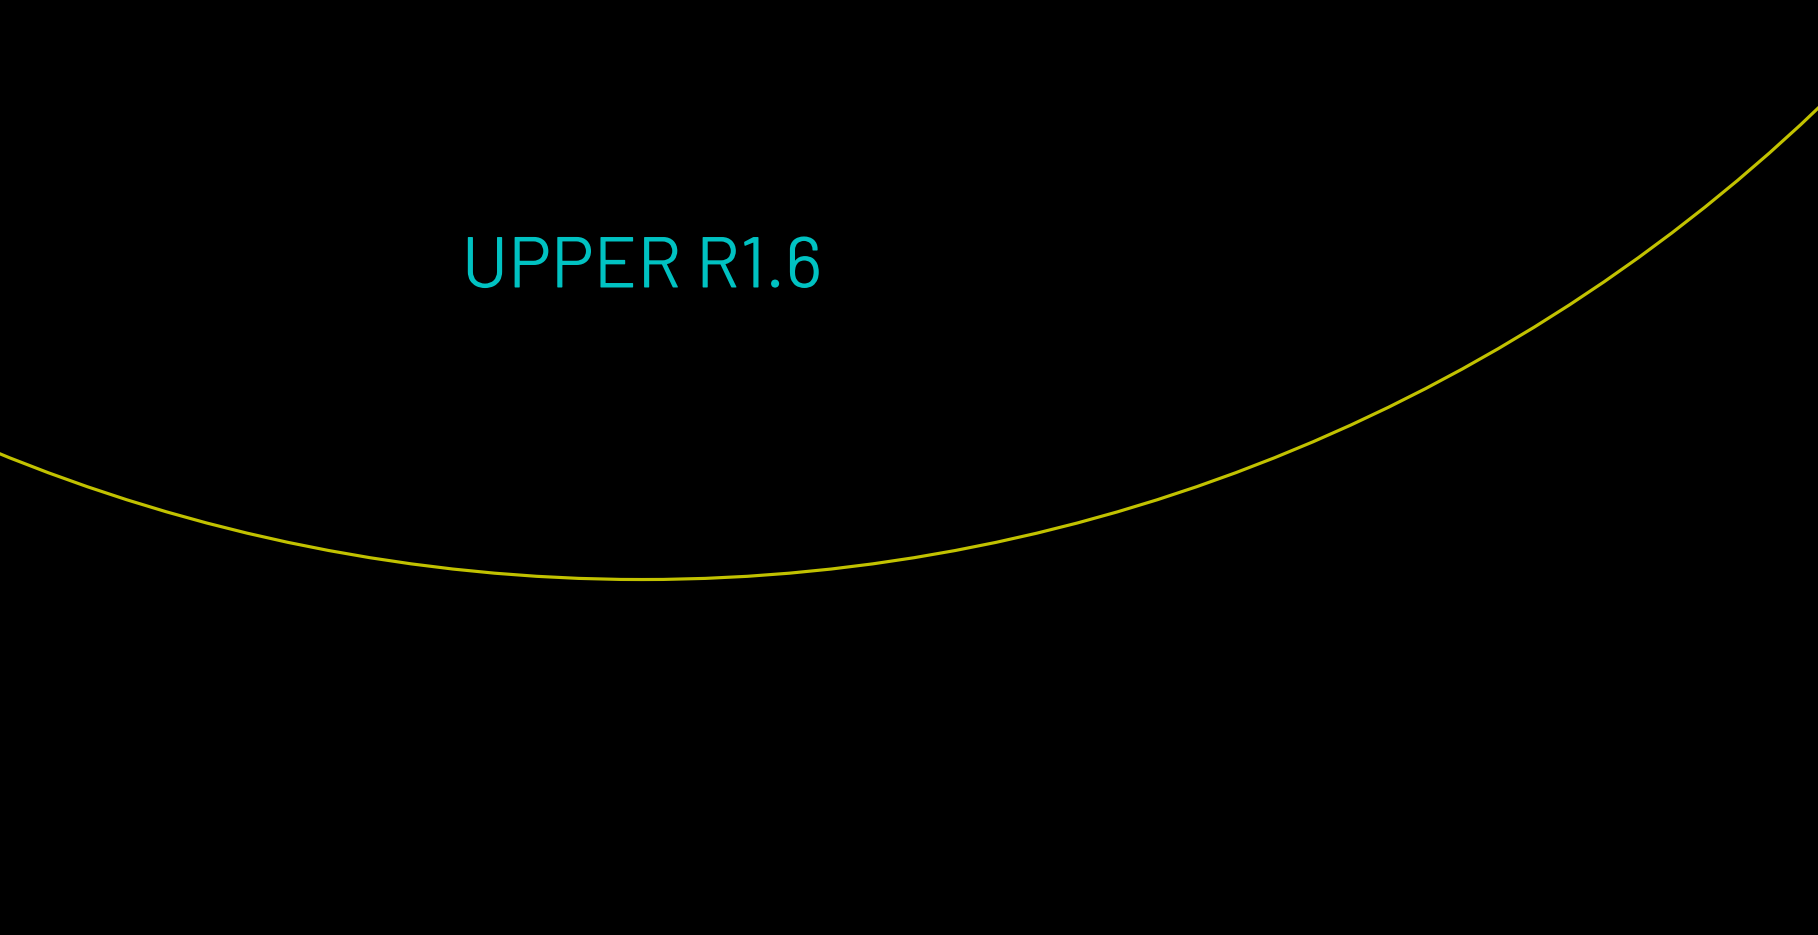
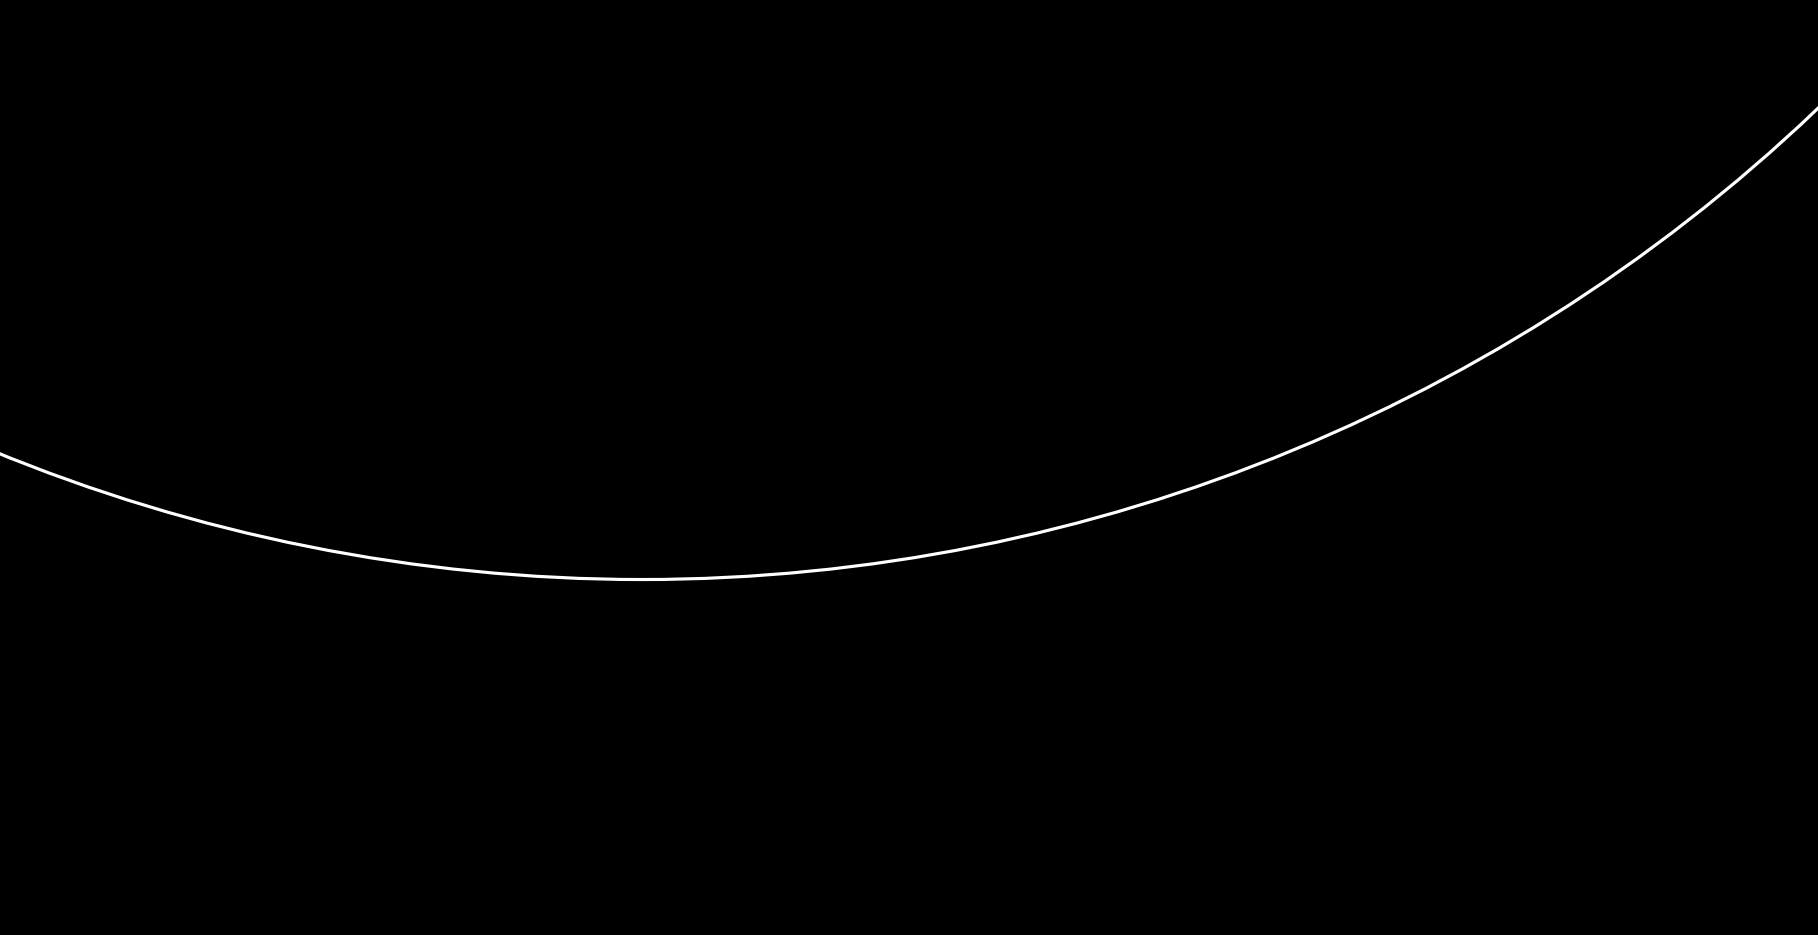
text: UPPER R1.6 (643, 262) -> none

